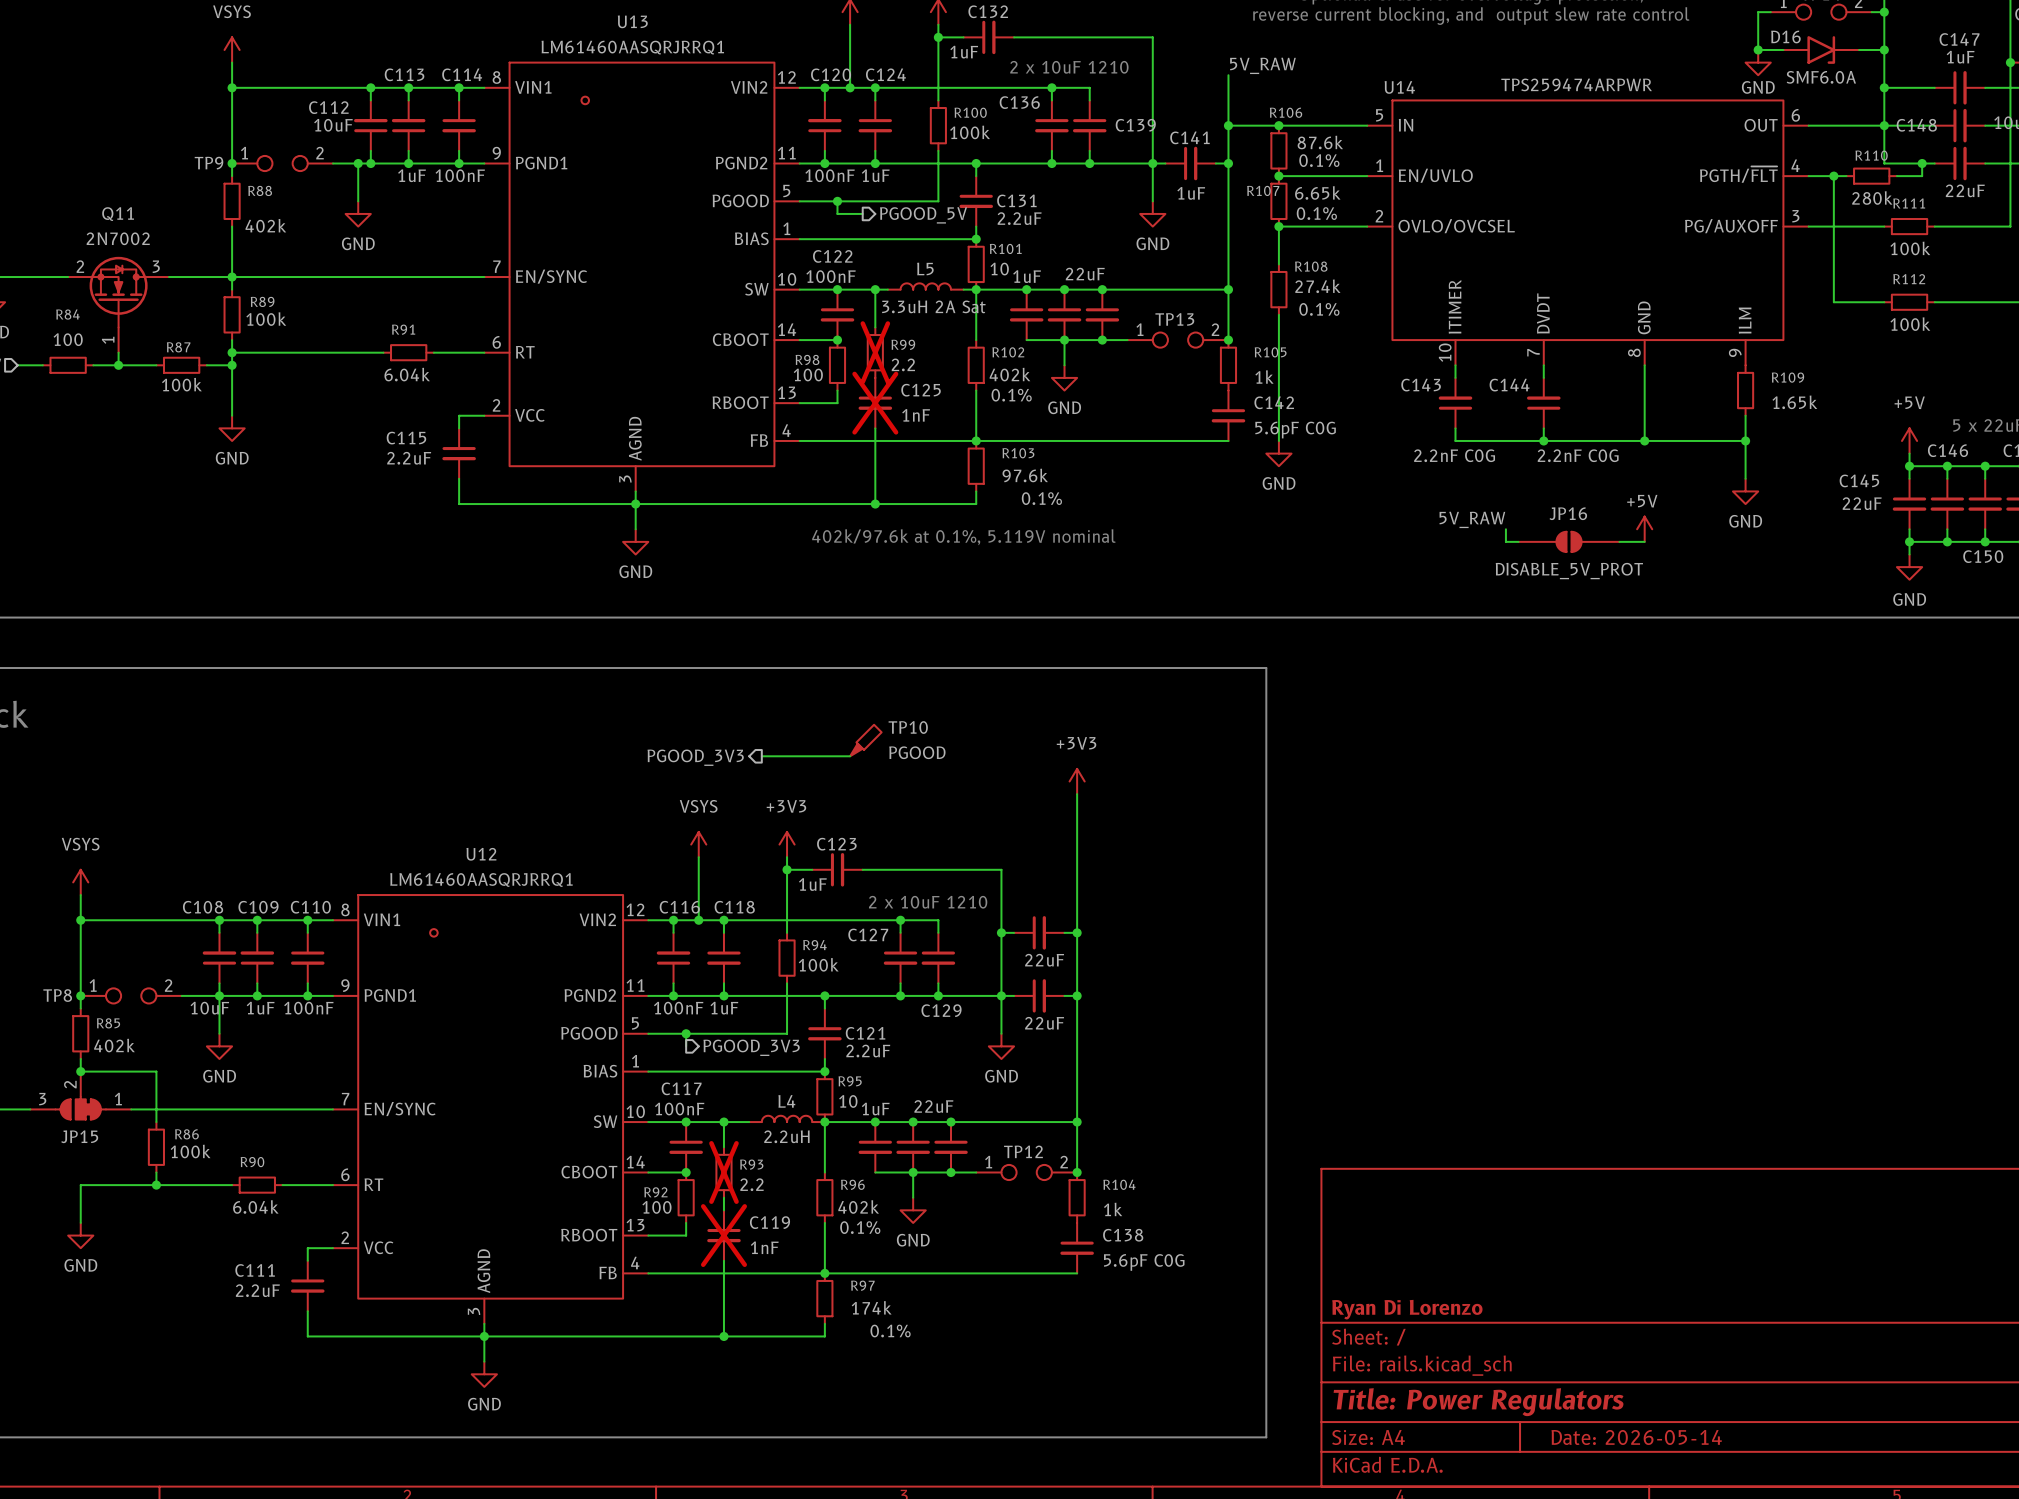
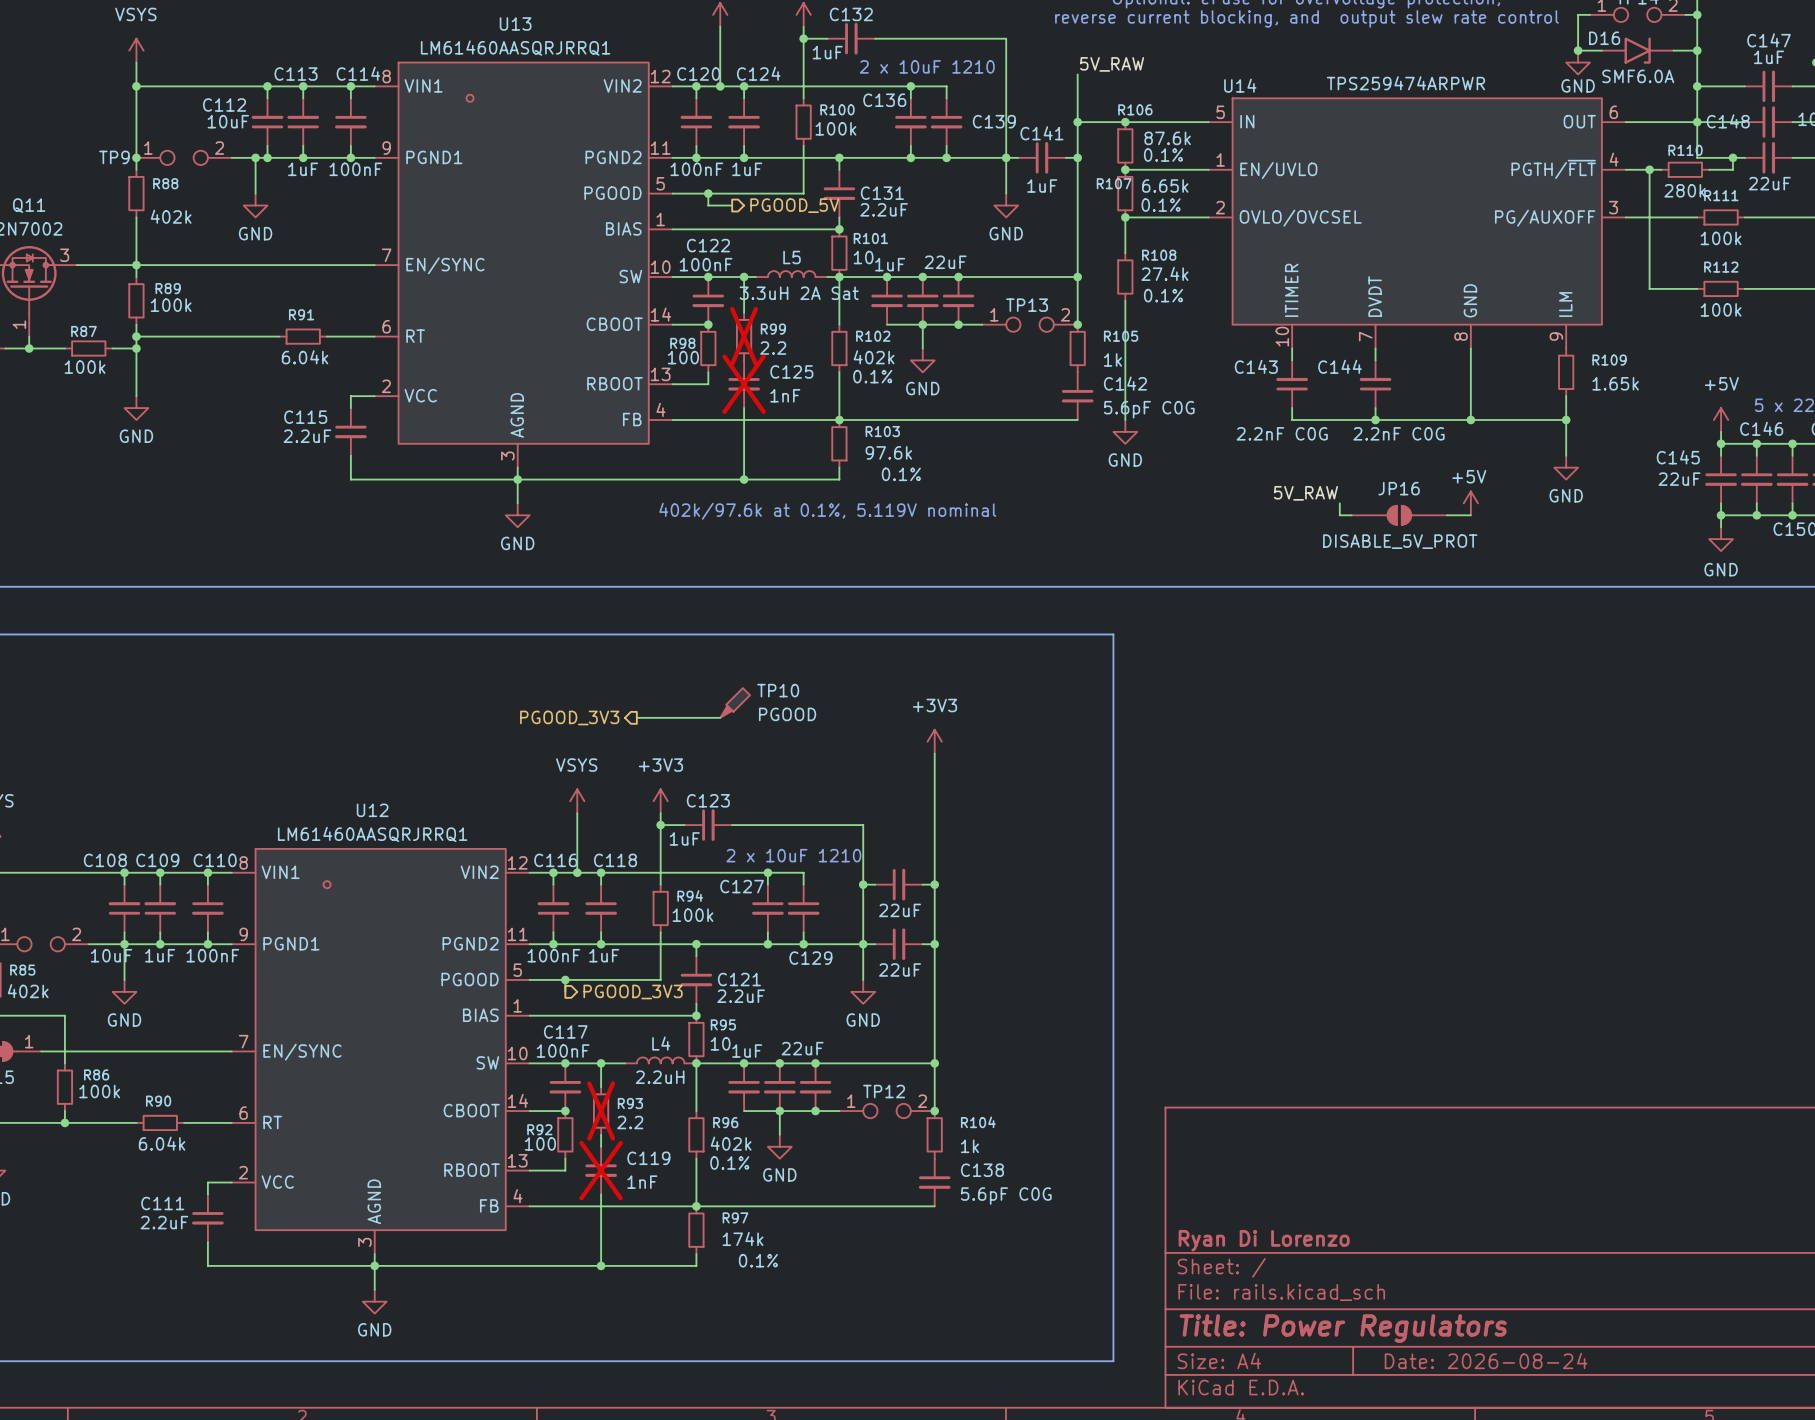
title block: Date: 2026-05-14 (1636, 1437) -> Date: 2026-08-24 (1486, 1360)

